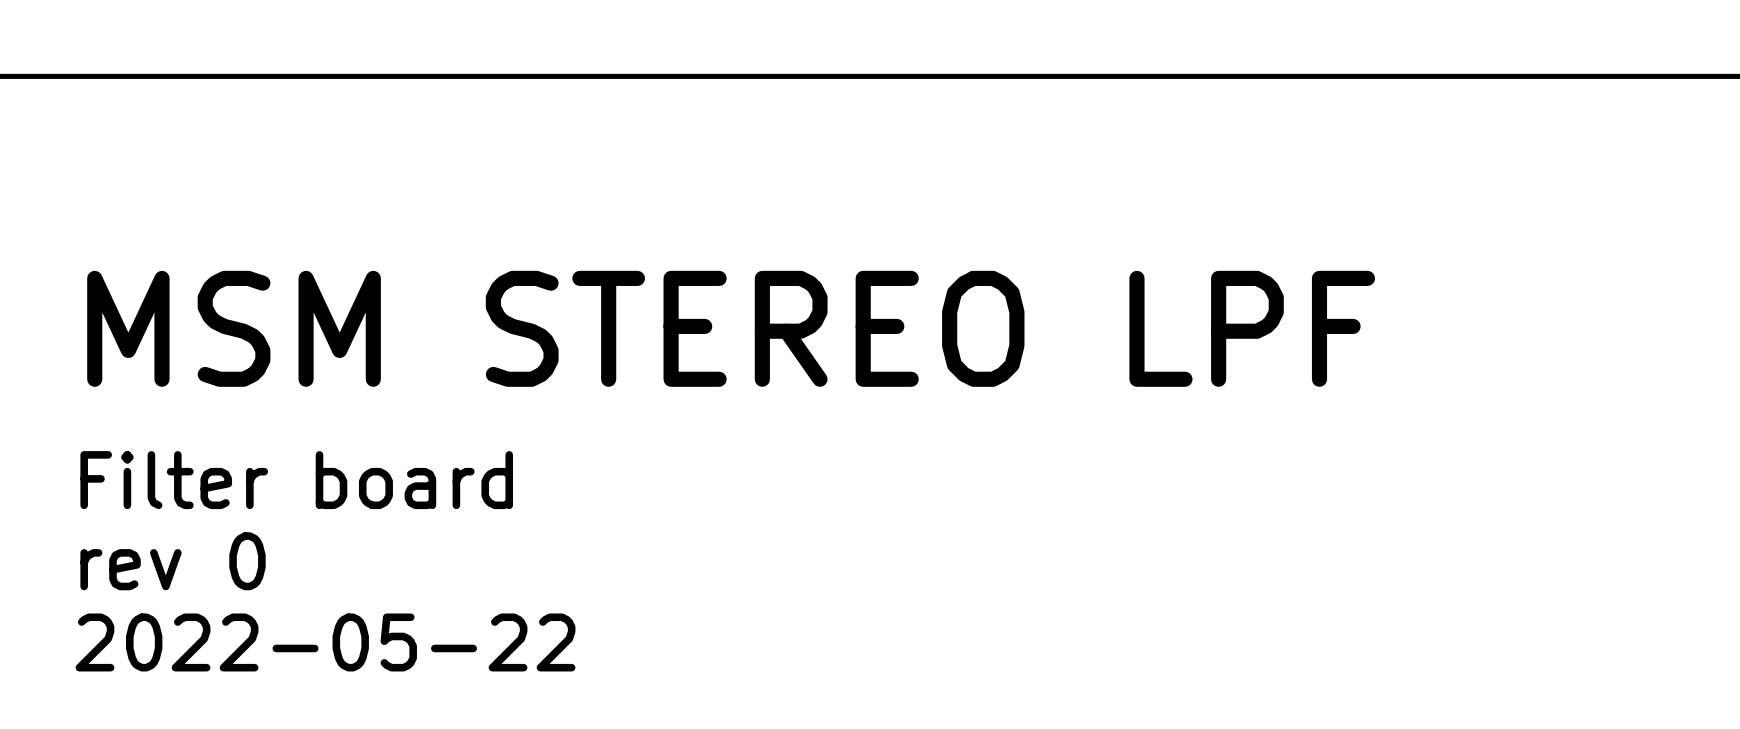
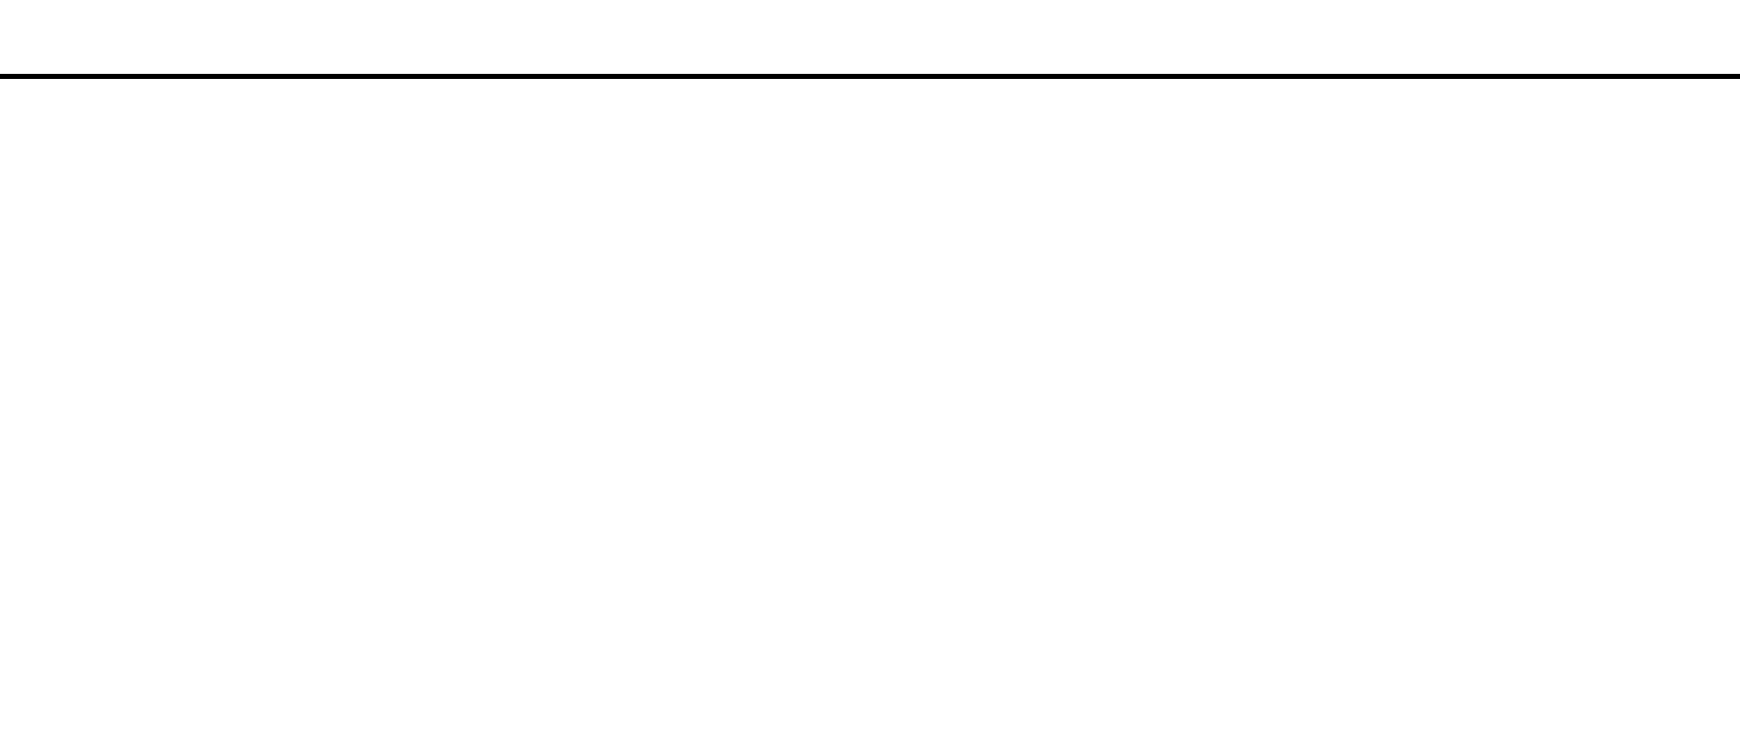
text: MSM STEREO LPF (731, 328) -> none
text: Filter board (296, 480) -> none
text: rev 0 (173, 561) -> none
text: 2022-05-22 (325, 642) -> none

